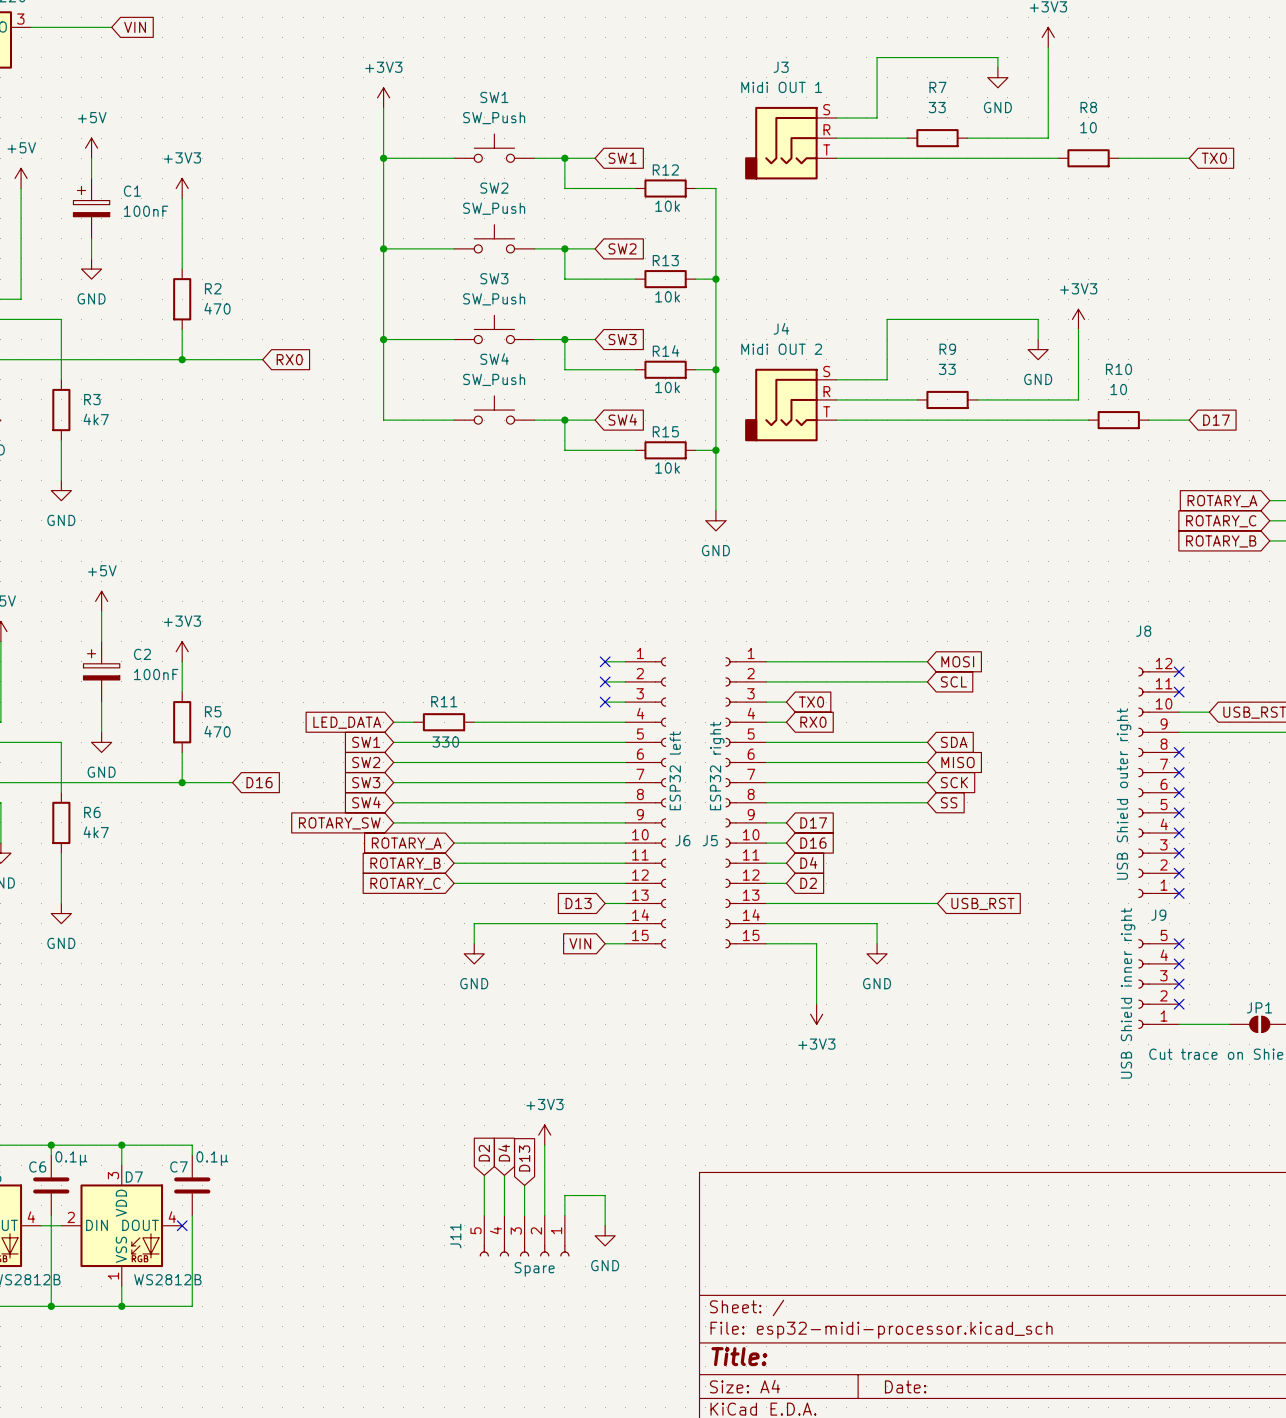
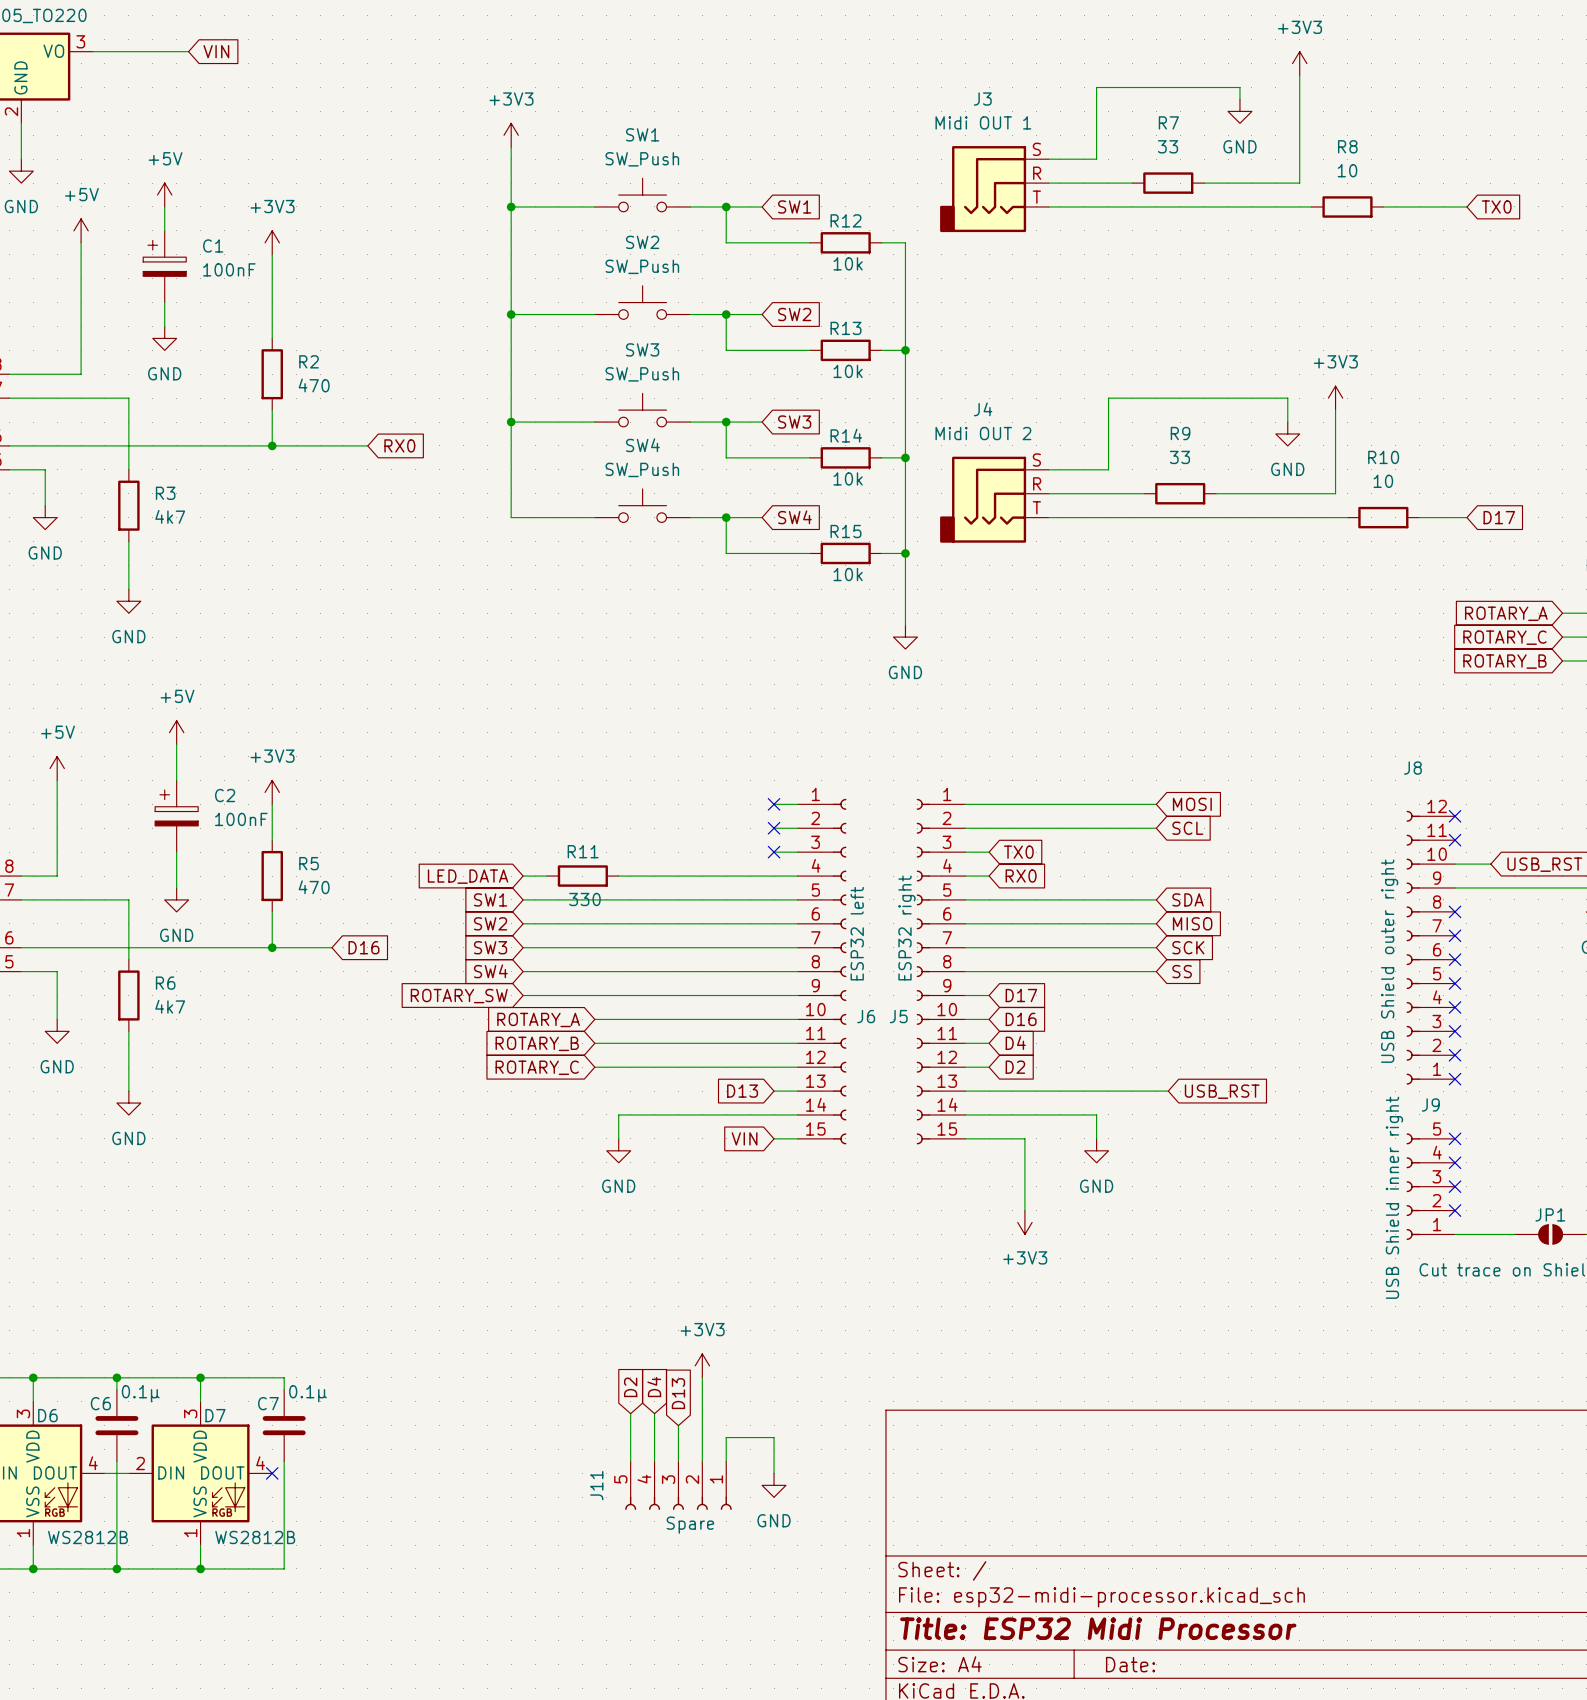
title block: Title: (739, 1356) -> Title: ESP32 Midi Processor (1098, 1628)

